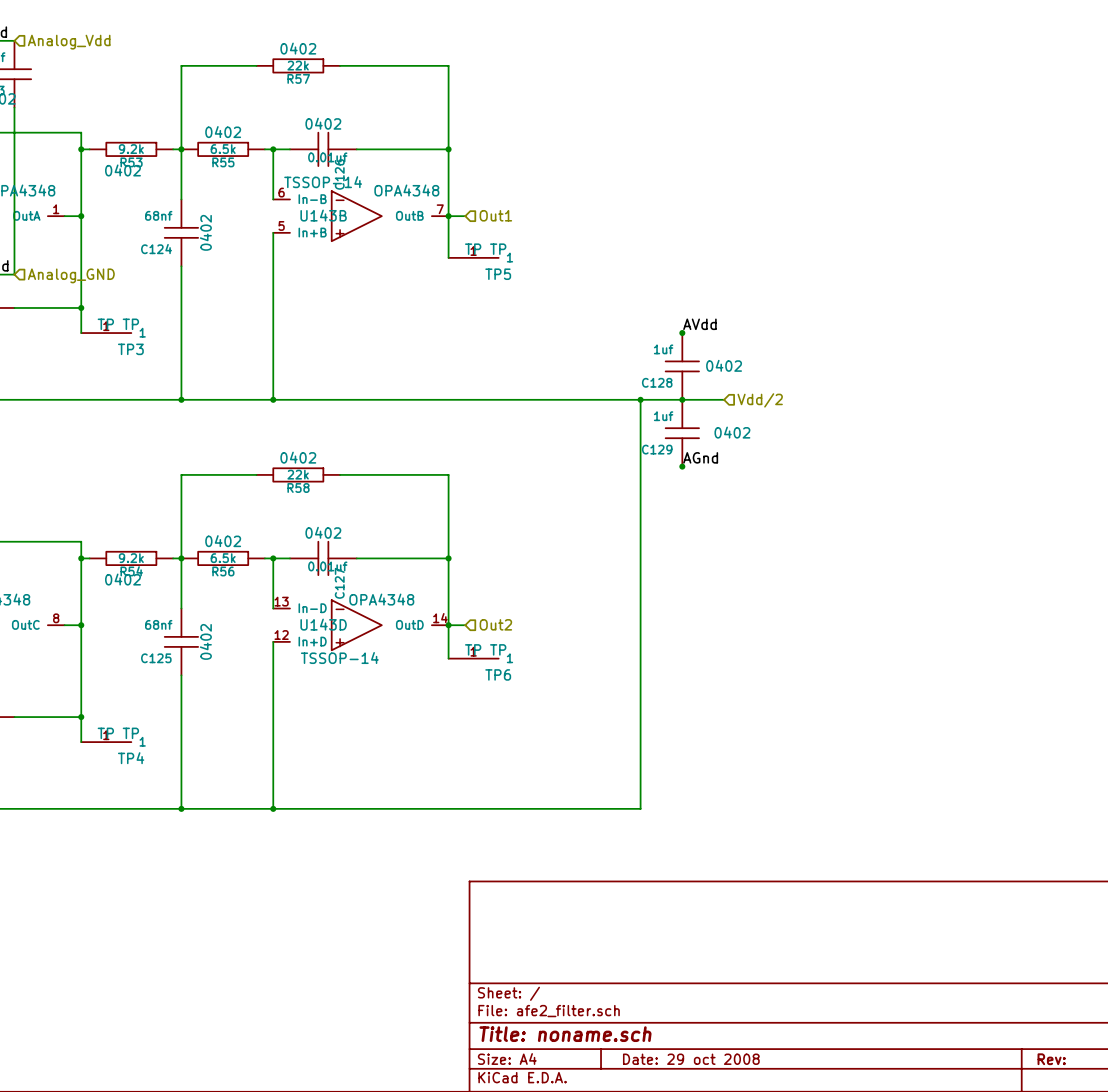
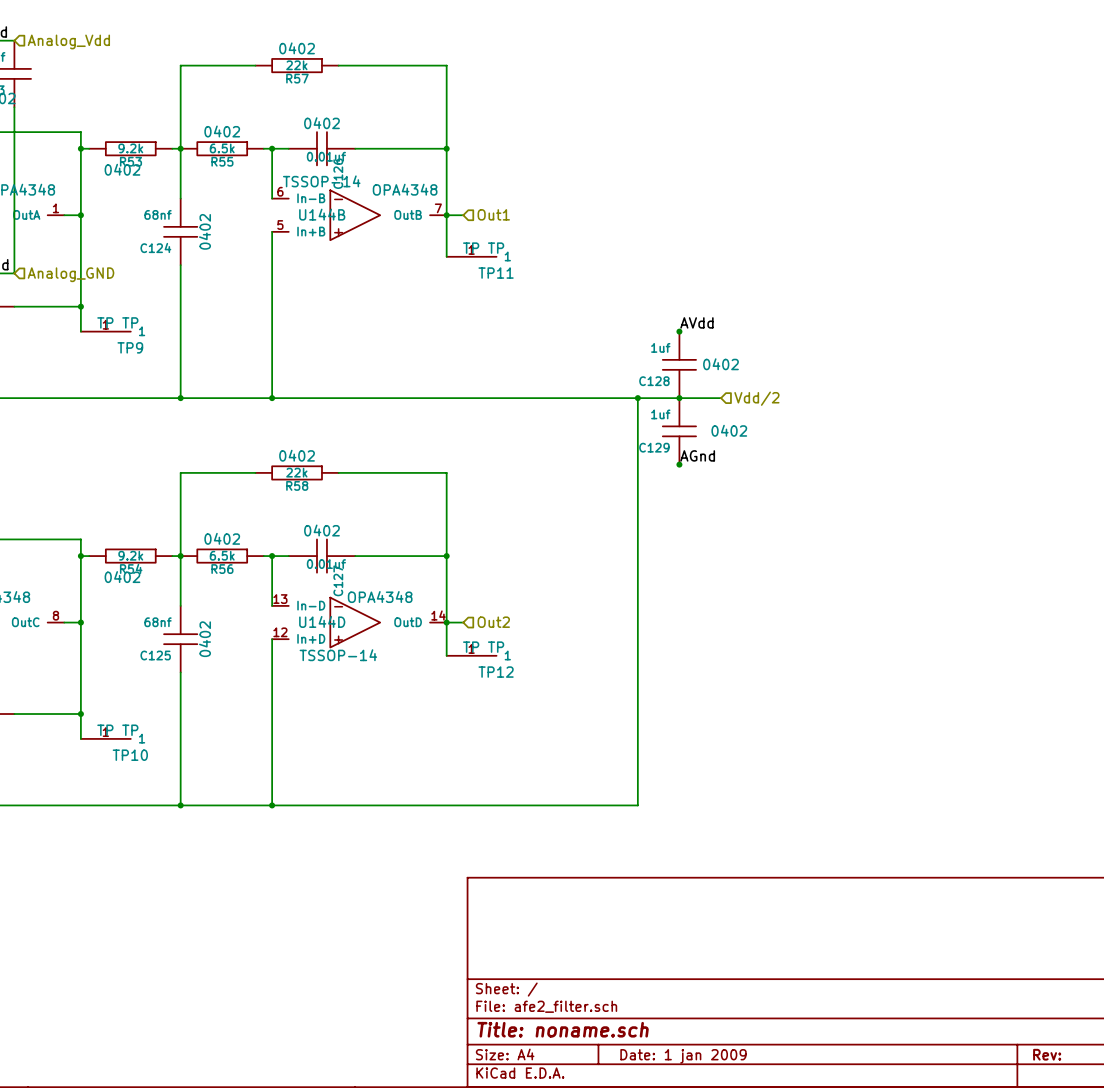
U143B name: U143B (323, 215) -> U144B (322, 214)
TP5 name: TP5 (498, 274) -> TP11 (496, 273)
TP3 name: TP3 (130, 349) -> TP9 (130, 347)
U143D name: U143D (323, 624) -> U144D (322, 621)
TP6 name: TP6 (498, 674) -> TP12 (496, 672)
TP4 name: TP4 (131, 758) -> TP10 (130, 755)
title block: Date: 29 oct 2008 (691, 1059) -> Date: 1 jan 2009 (683, 1056)

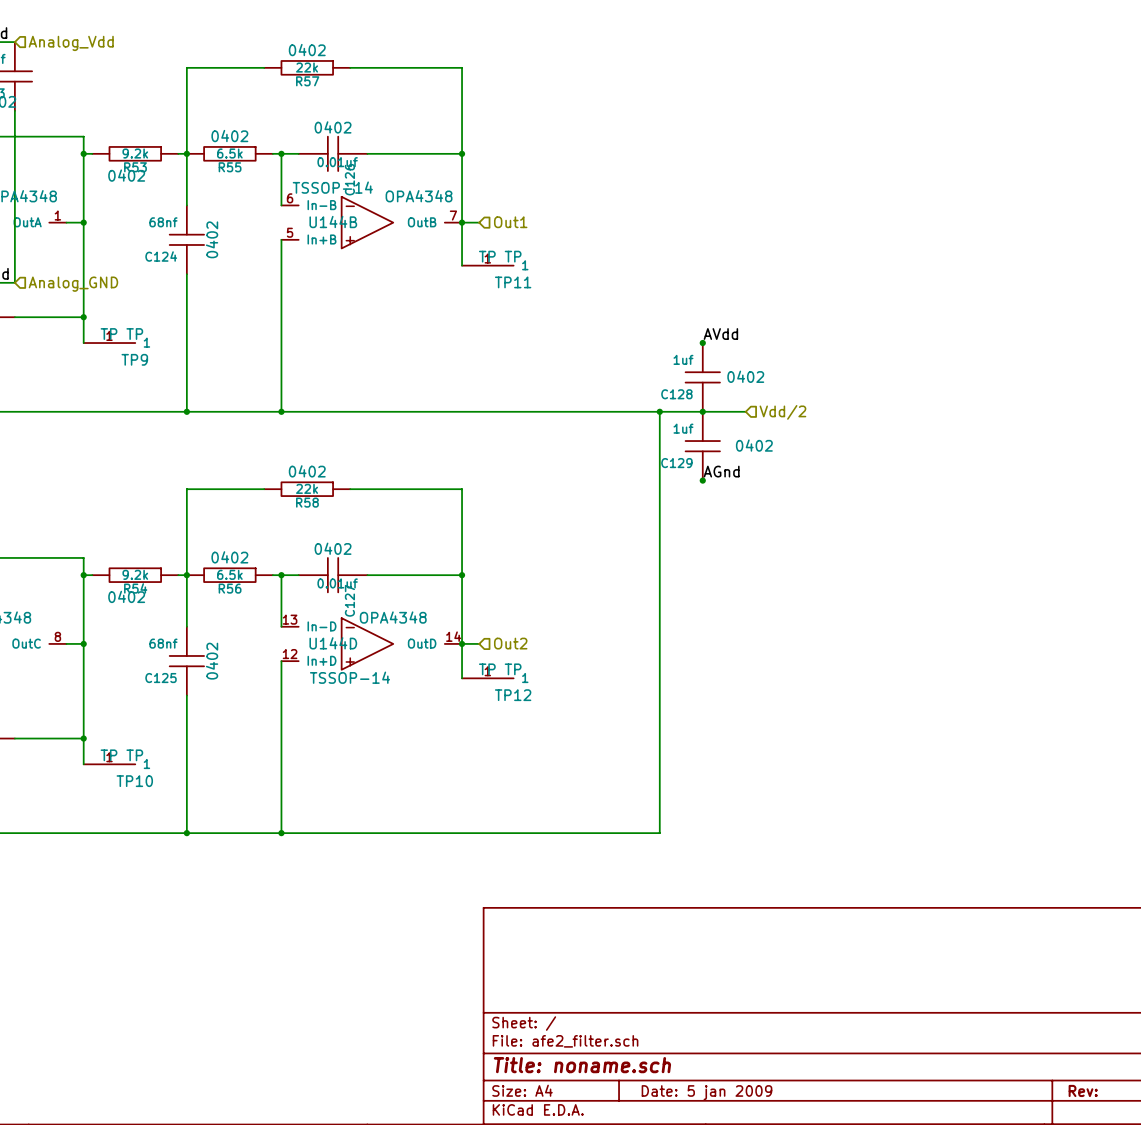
title block: Date: 1 jan 2009 (683, 1056) -> Date: 5 jan 2009 (706, 1092)

